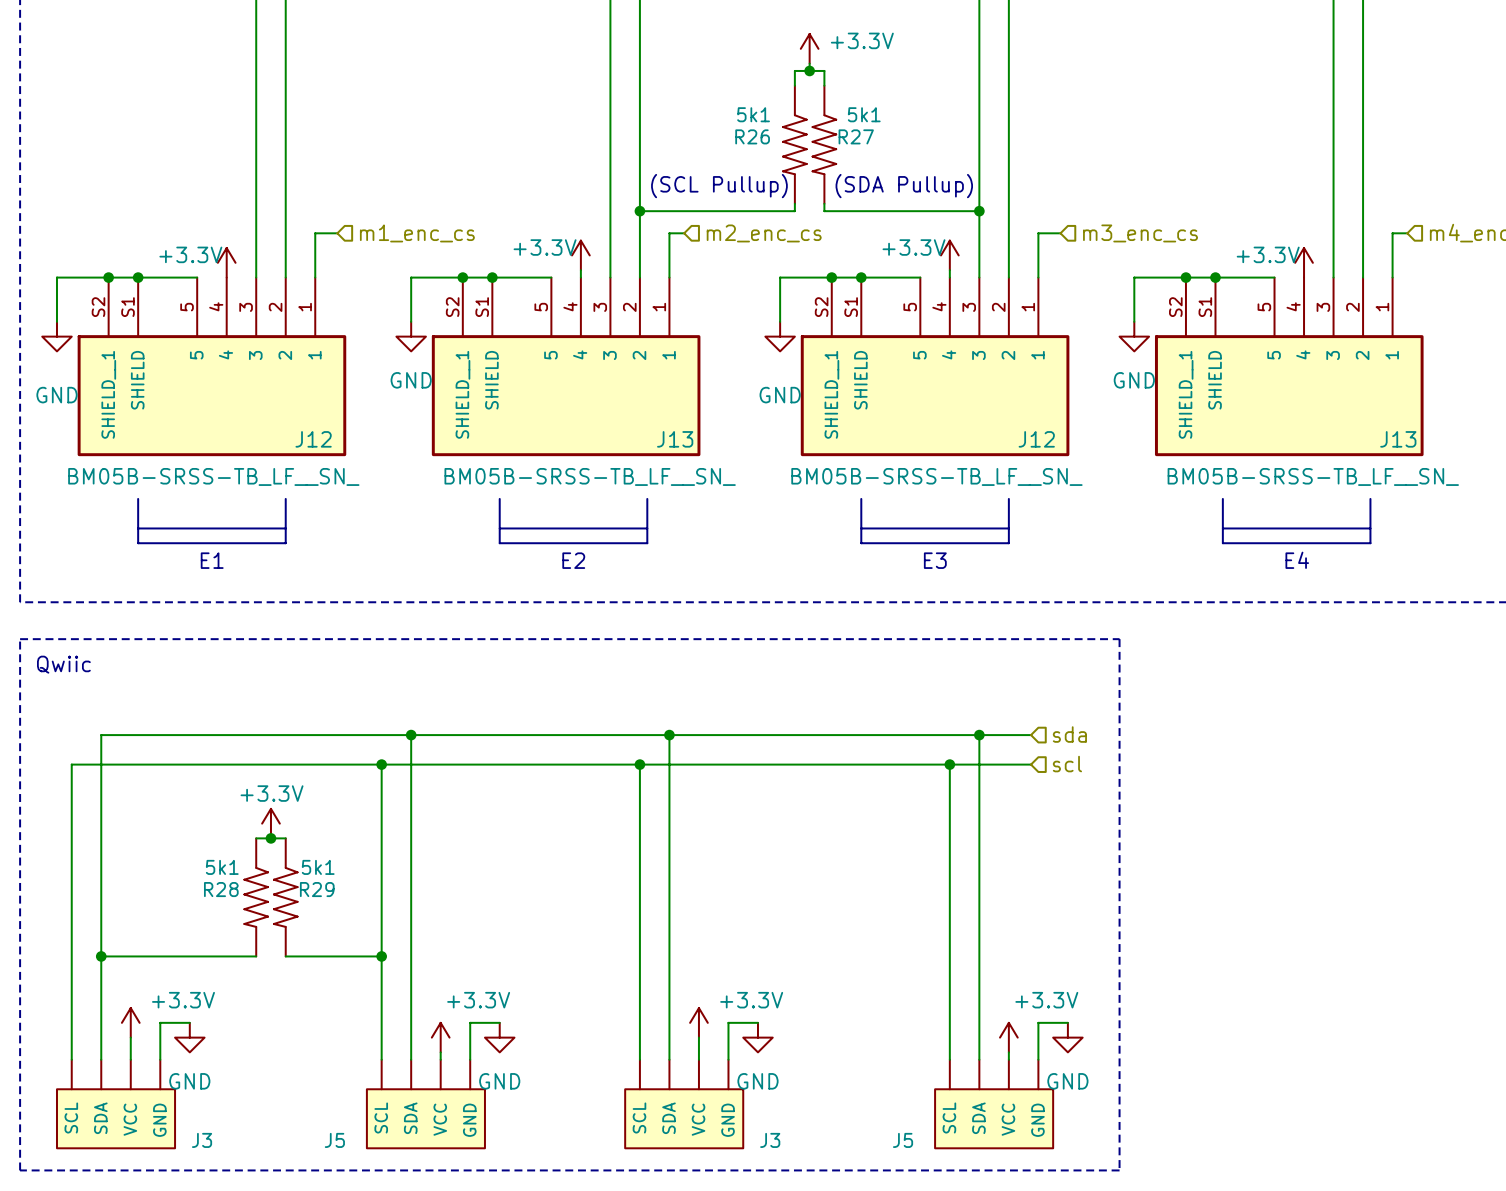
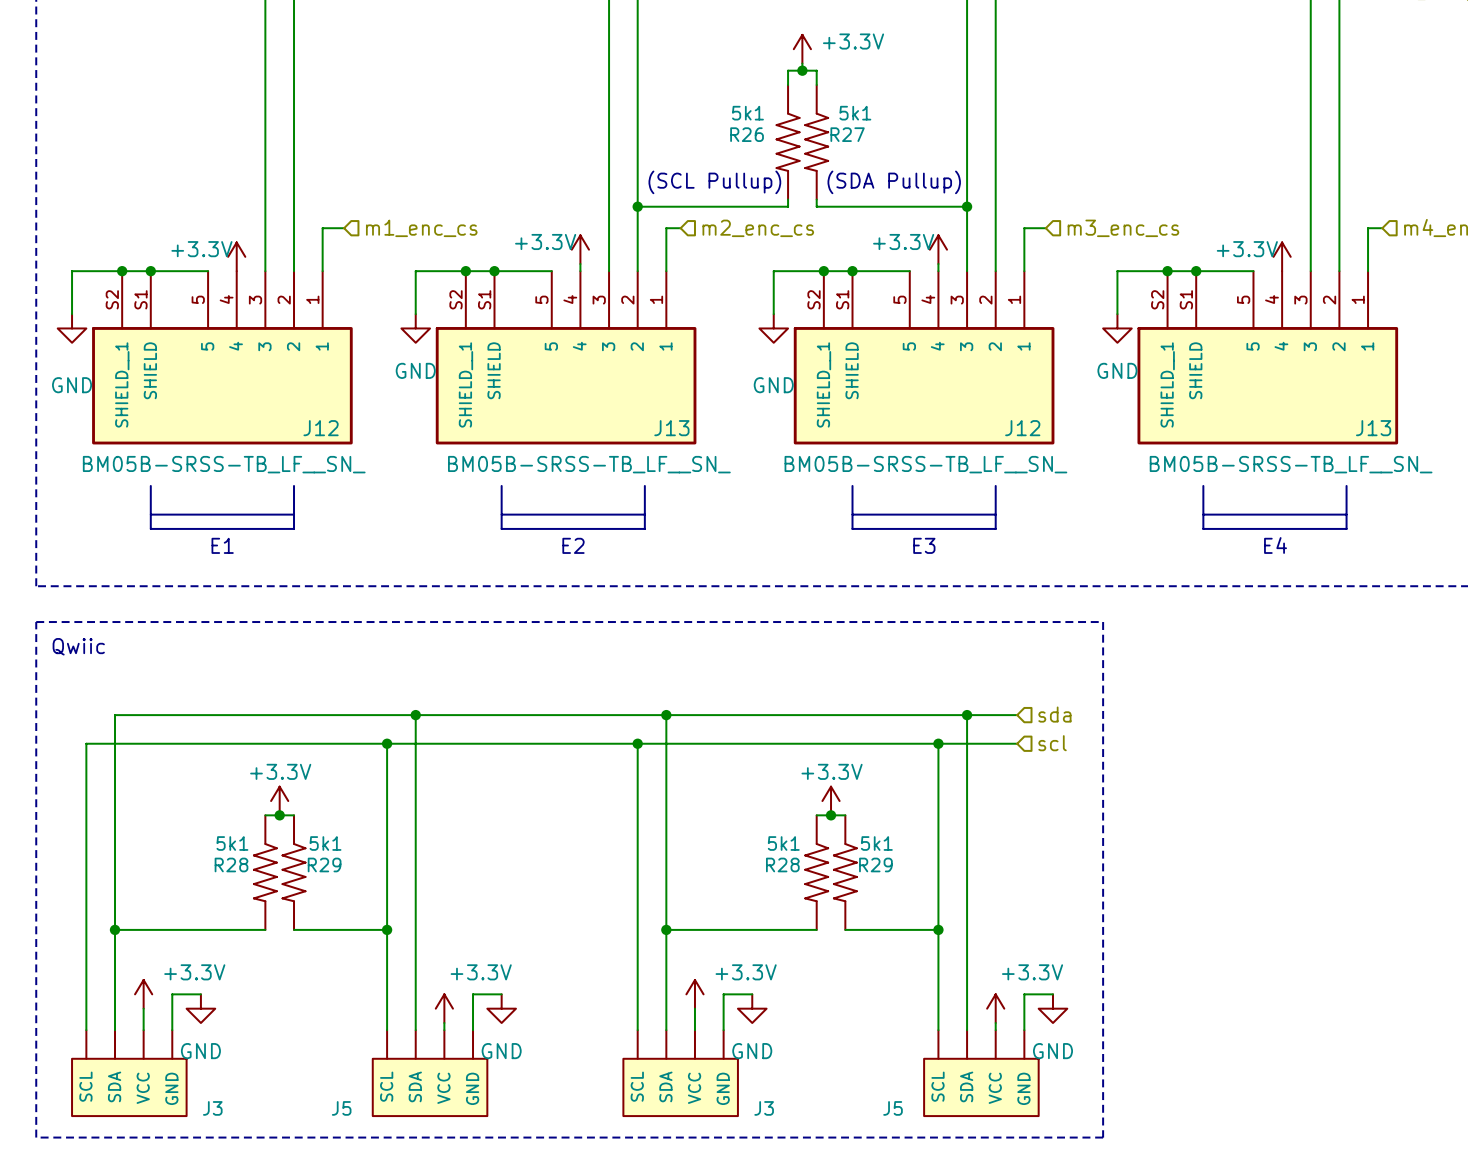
power symbol: none -> +3.3V (831, 801)
wire: none -> (816, 815) (845, 815)
junction: none -> (831, 815)
R28: none -> 5k1 (816, 872)
R29: none -> 5k1 (845, 872)
wire: none -> (666, 929) (816, 929)
junction: none -> (666, 929)
wire: none -> (845, 929) (938, 929)
junction: none -> (938, 929)

